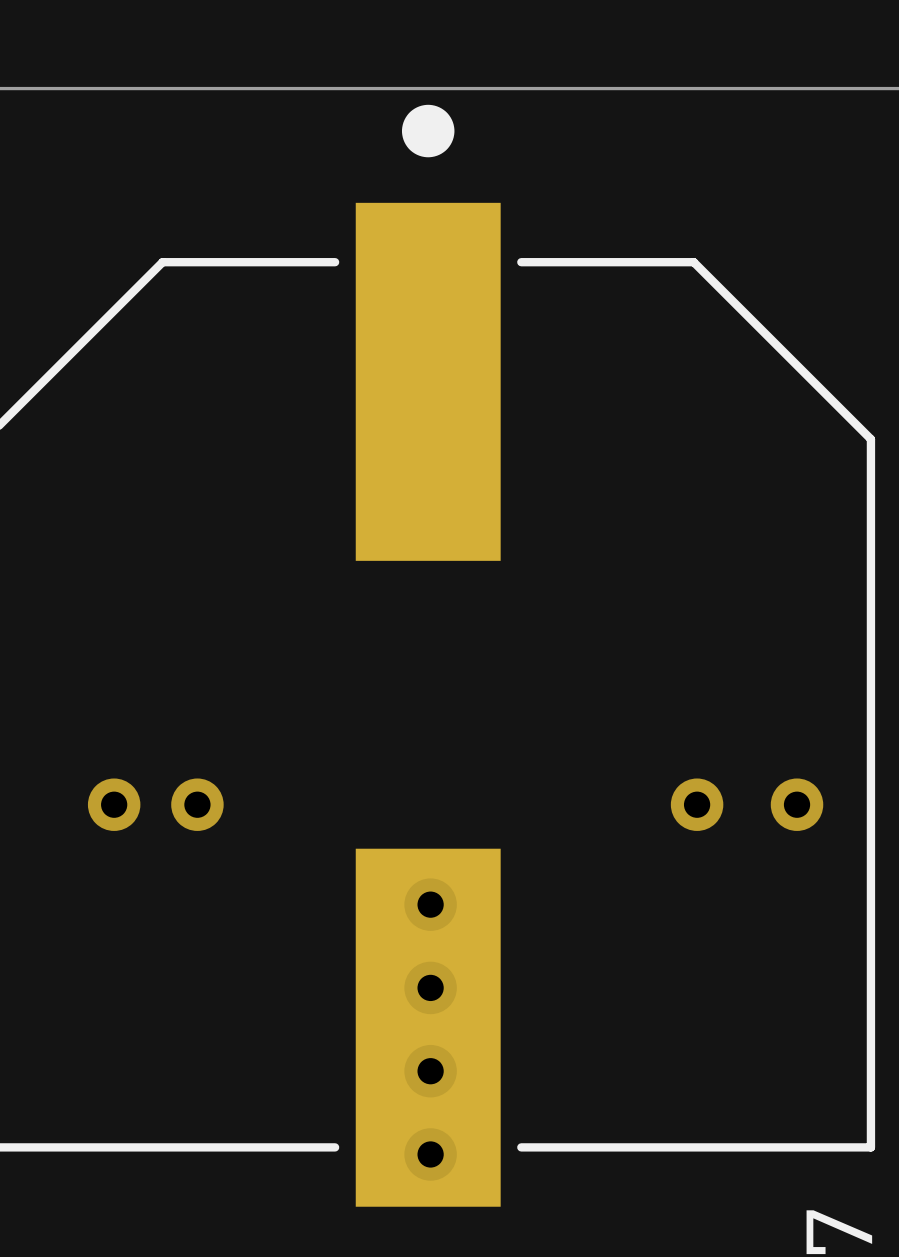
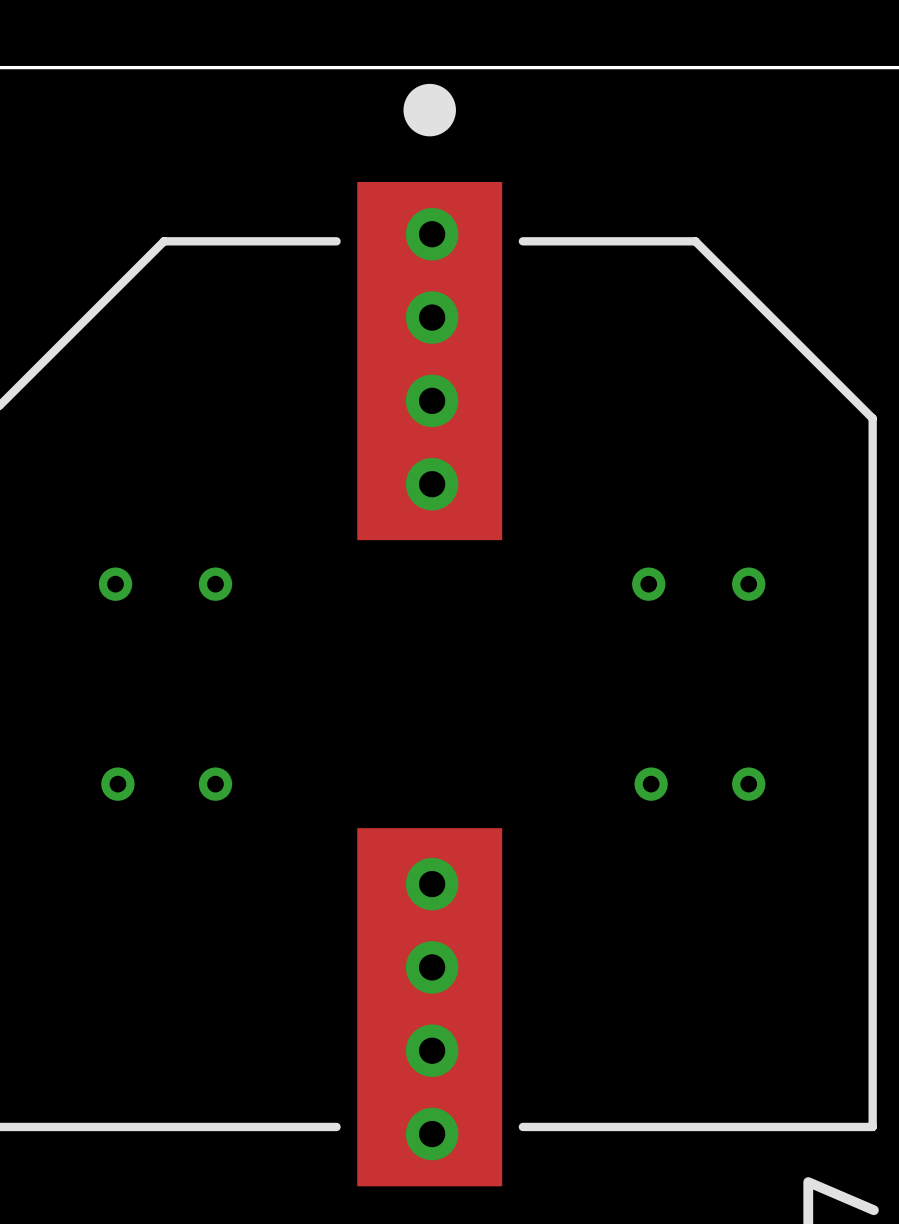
via: none -> (432, 234)
via: none -> (432, 317)
via: none -> (432, 400)
via: none -> (432, 484)
via: none -> (115, 584)
via: none -> (215, 584)
via: none -> (648, 584)
via: none -> (748, 584)
via size: [87, 778, 141, 831] -> [101, 767, 135, 801]
via size: [171, 778, 224, 831] -> [198, 767, 233, 801]
via: none -> (651, 784)
via: (697, 804) -> none
via: none -> (748, 784)
via: (797, 804) -> none

